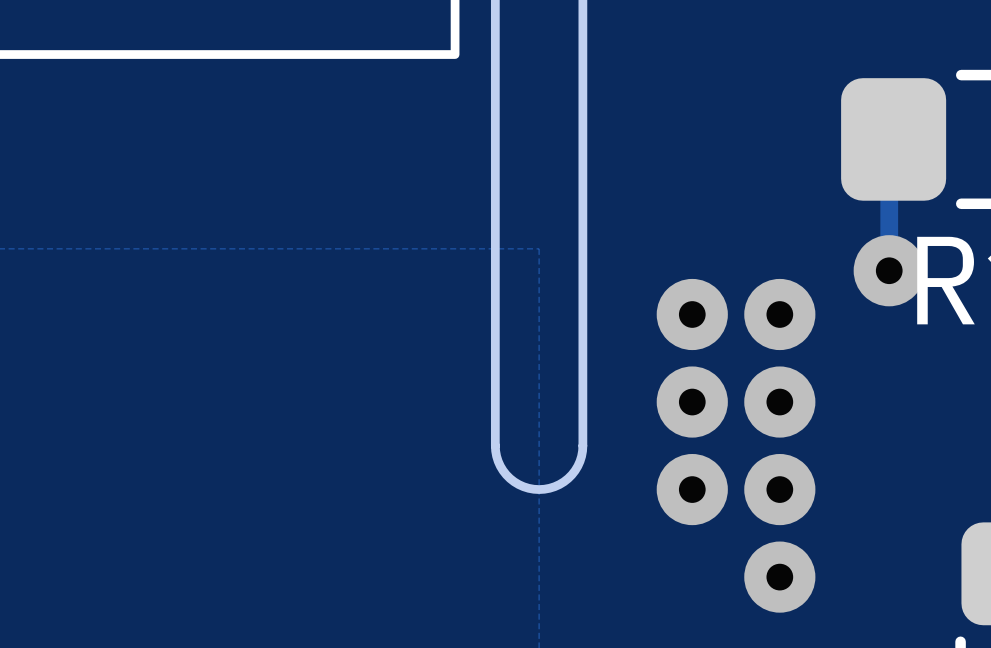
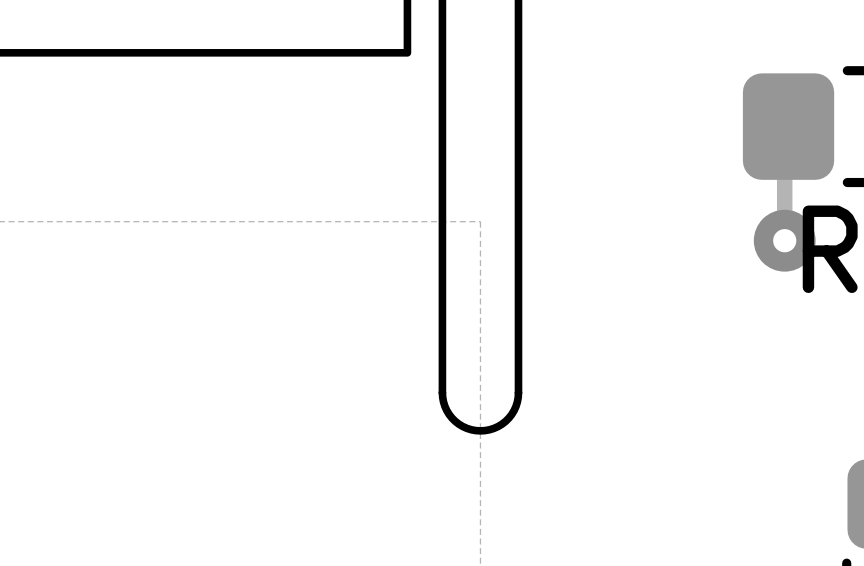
via: (692, 314) -> none
via: (779, 314) -> none
via: (692, 402) -> none
via: (779, 402) -> none
via: (692, 489) -> none
via: (779, 489) -> none
via: (779, 577) -> none

